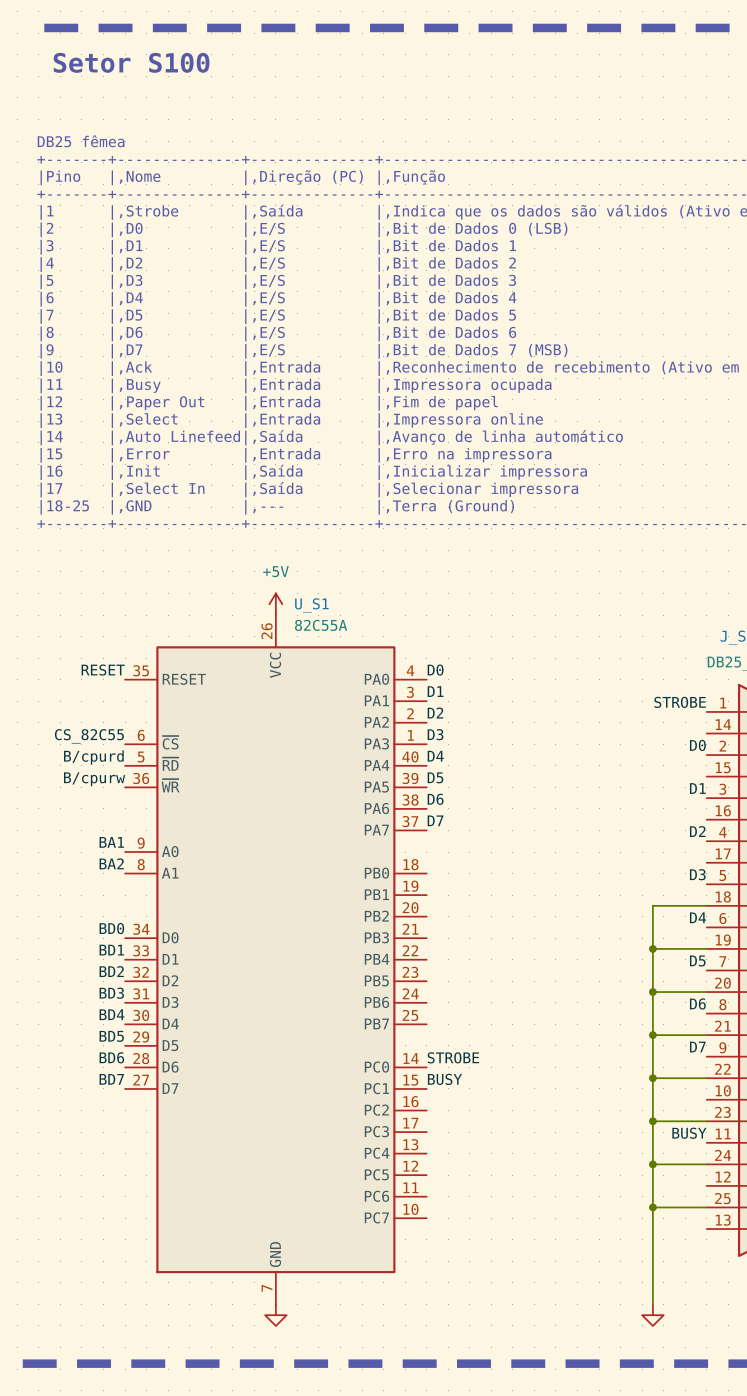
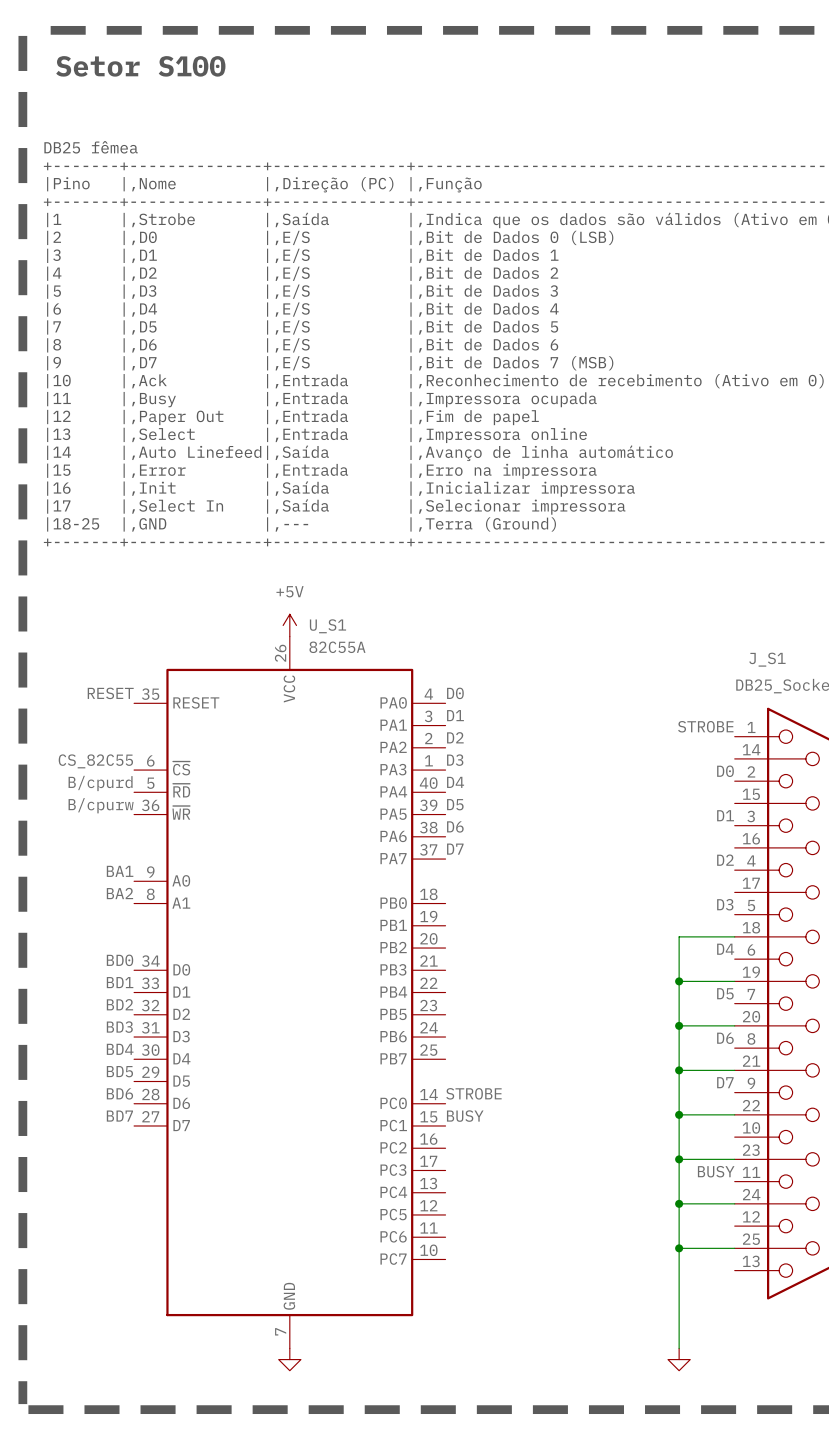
line: none -> (22, 35) (22, 1404)

